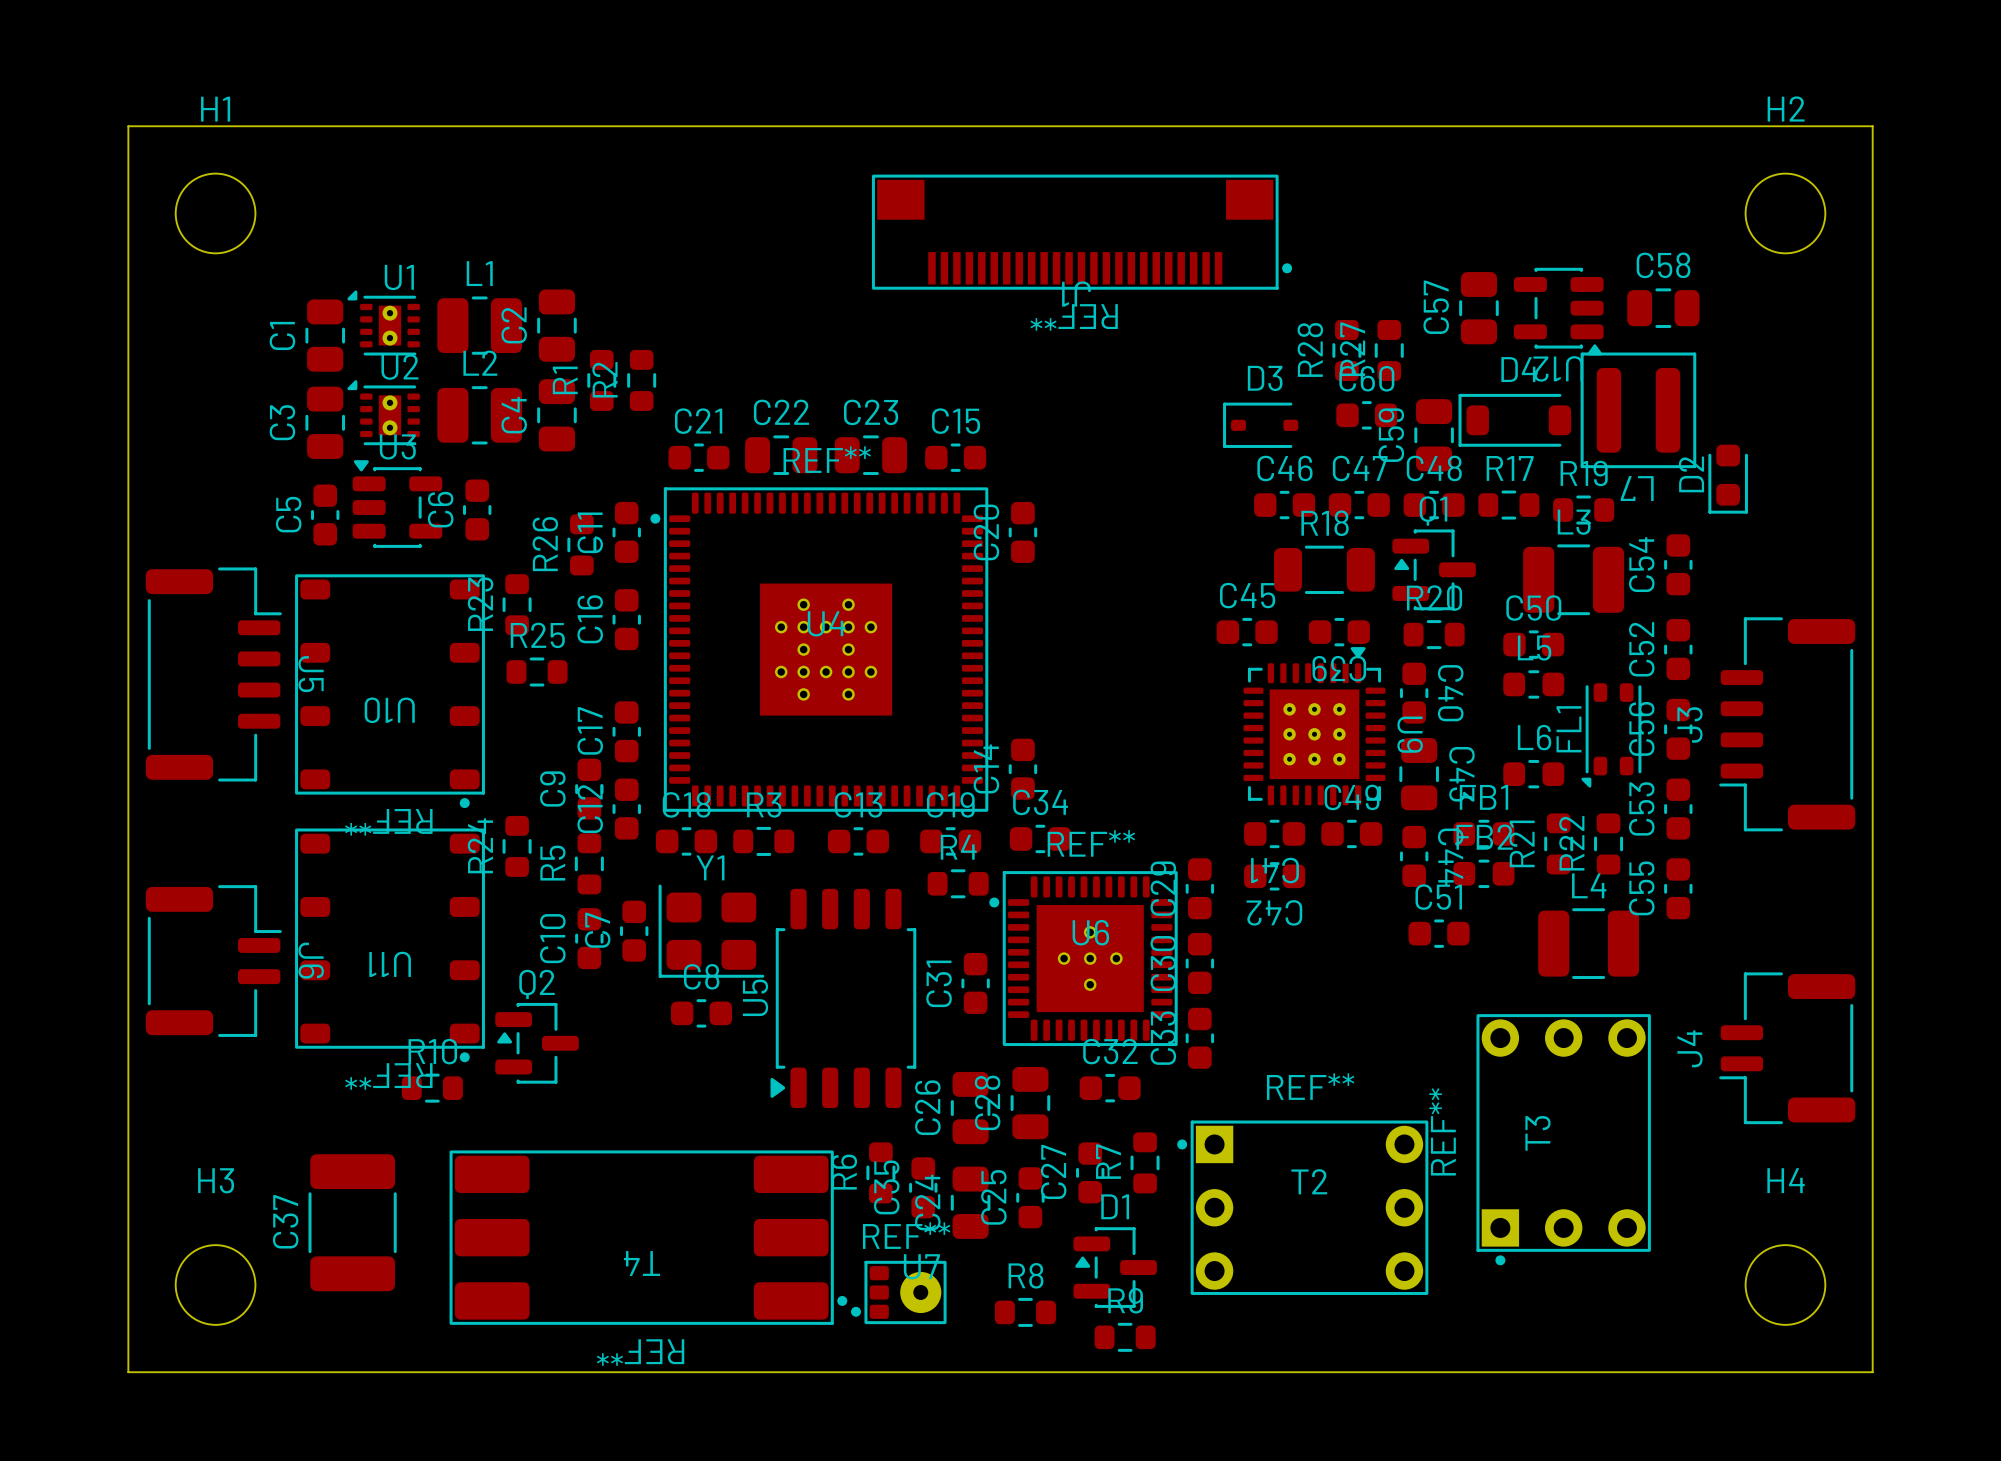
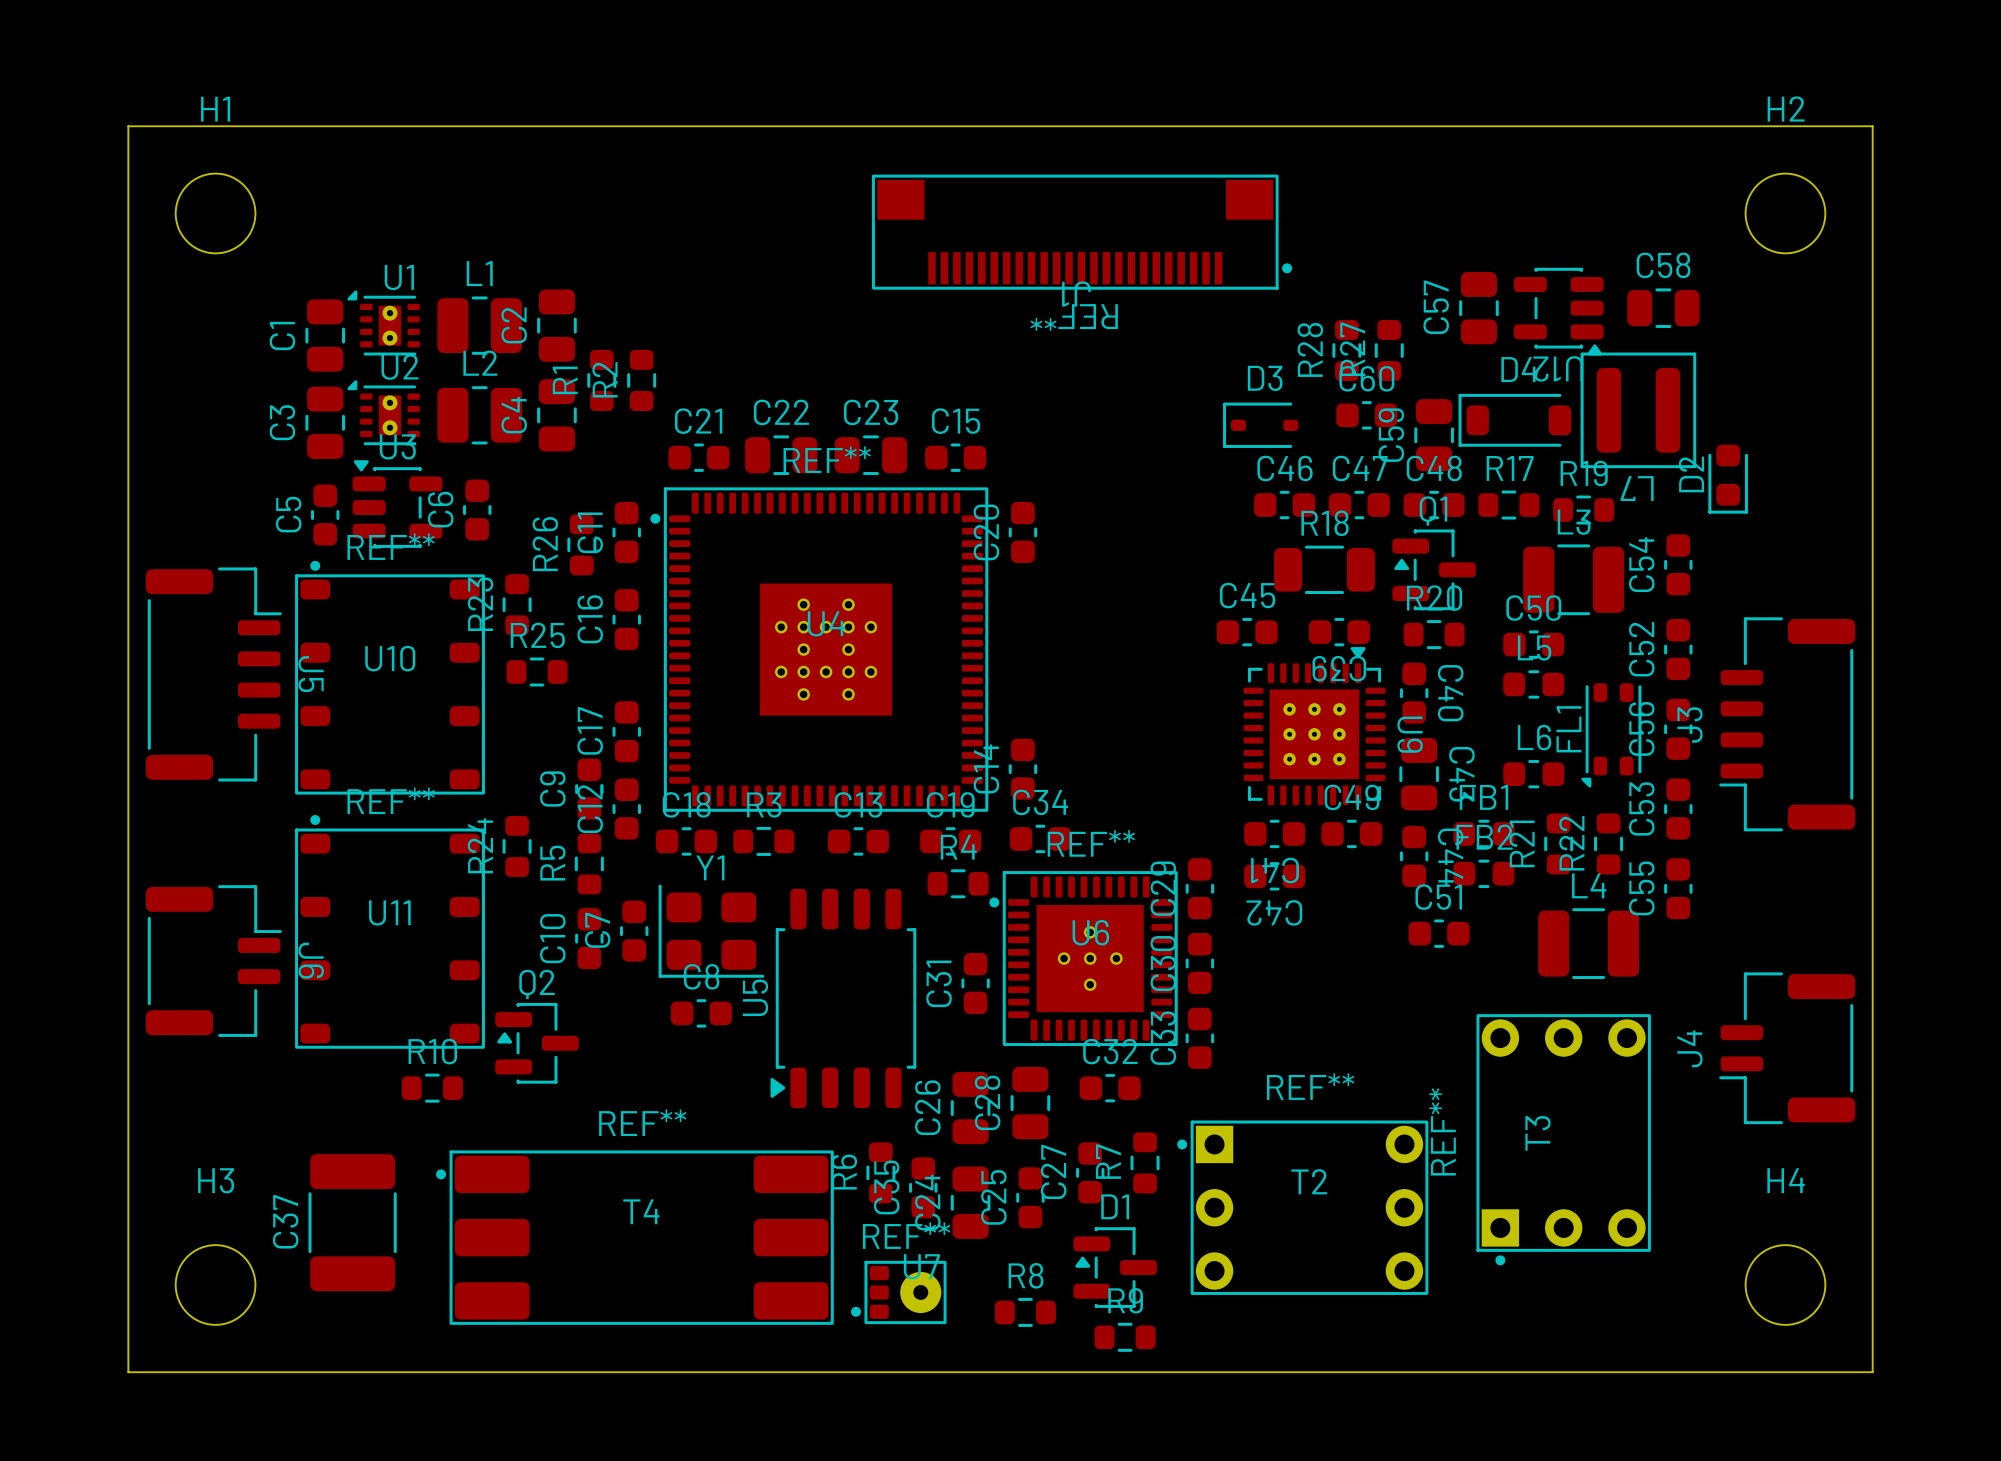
U10 rotation: 0° (390, 691) -> 180° (390, 677)
U11 rotation: 0° (390, 945) -> 180° (390, 931)
T4 rotation: 0° (648, 1237) -> 180° (634, 1237)

